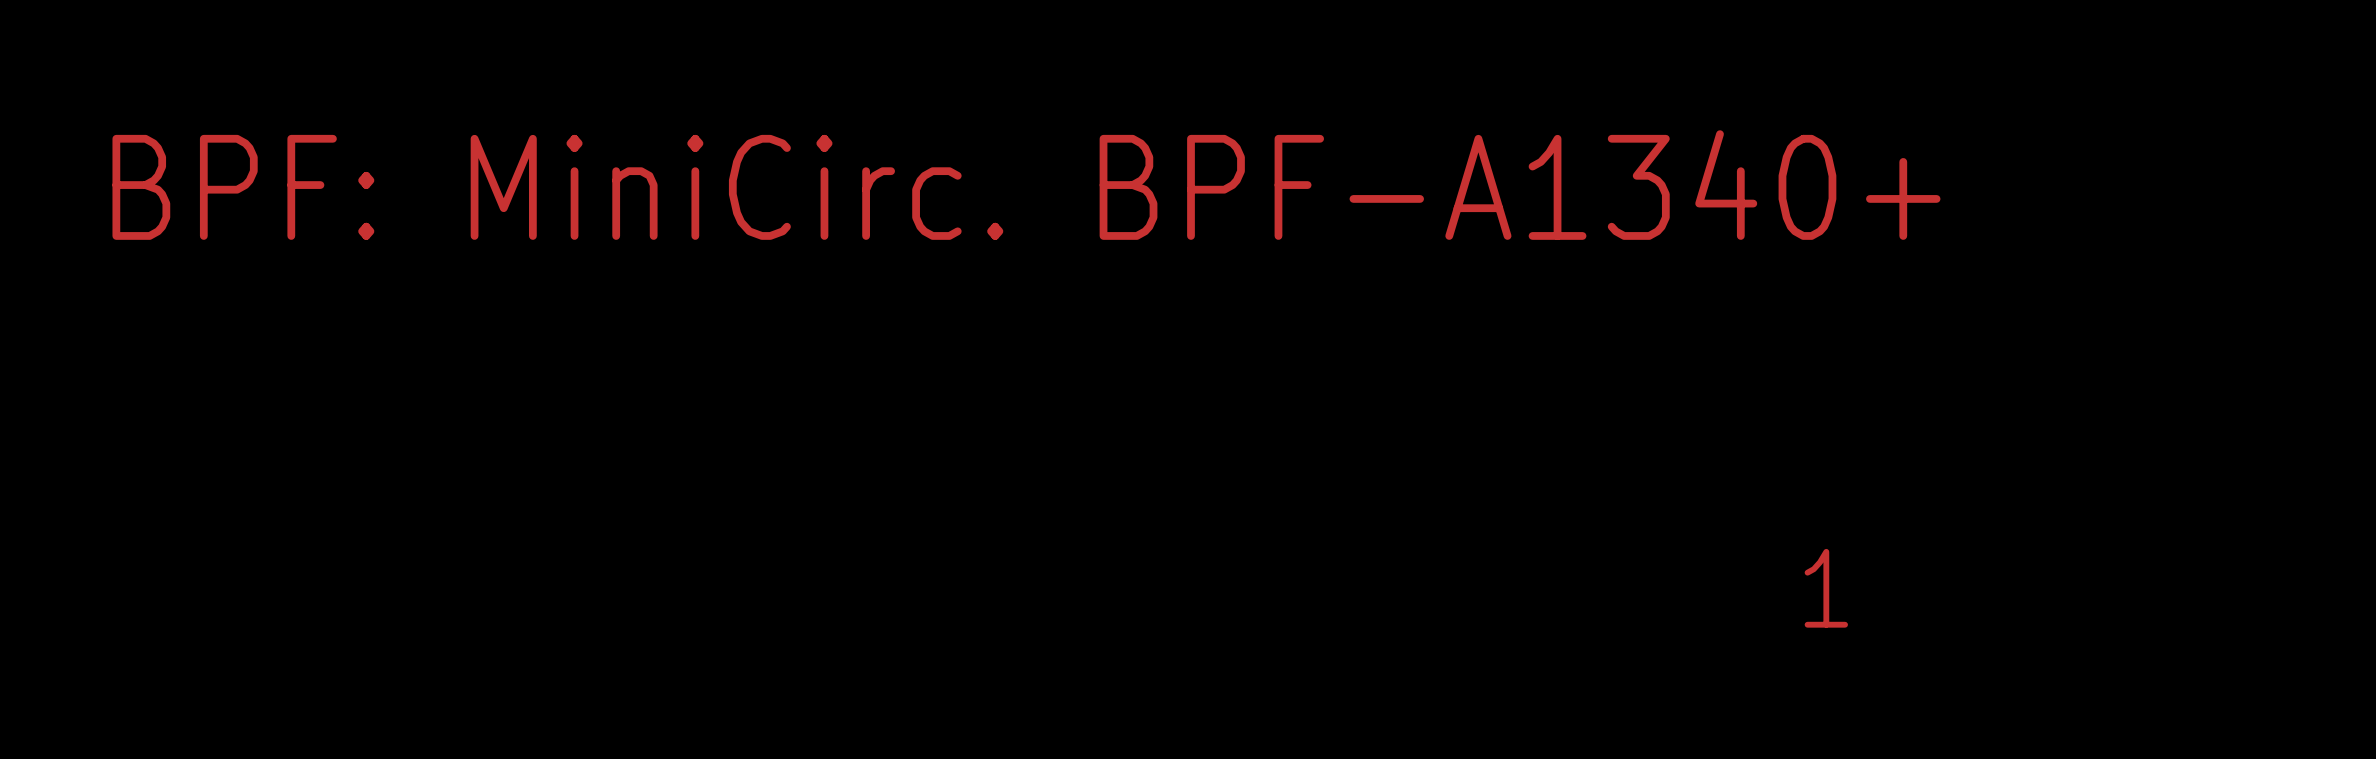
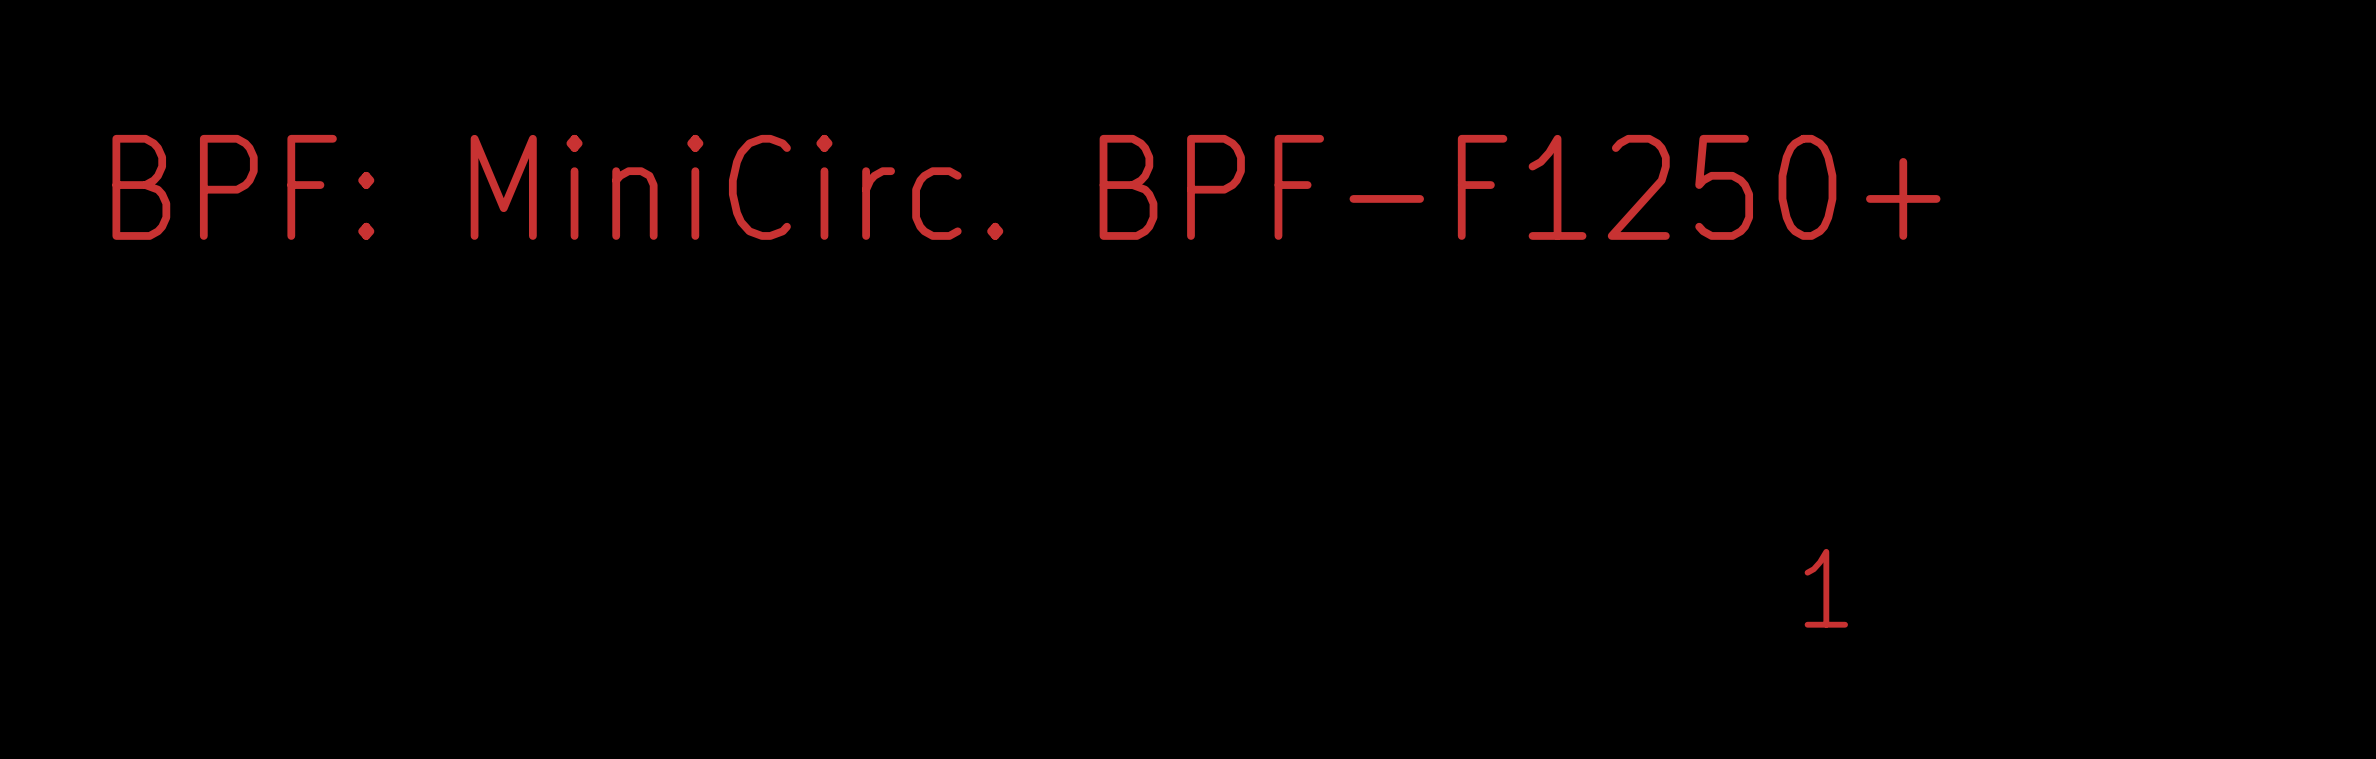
text: BPF: MiniCirc. BPF-A1340+ (1026, 185) -> BPF: MiniCirc. BPF-F1250+ (1026, 187)

